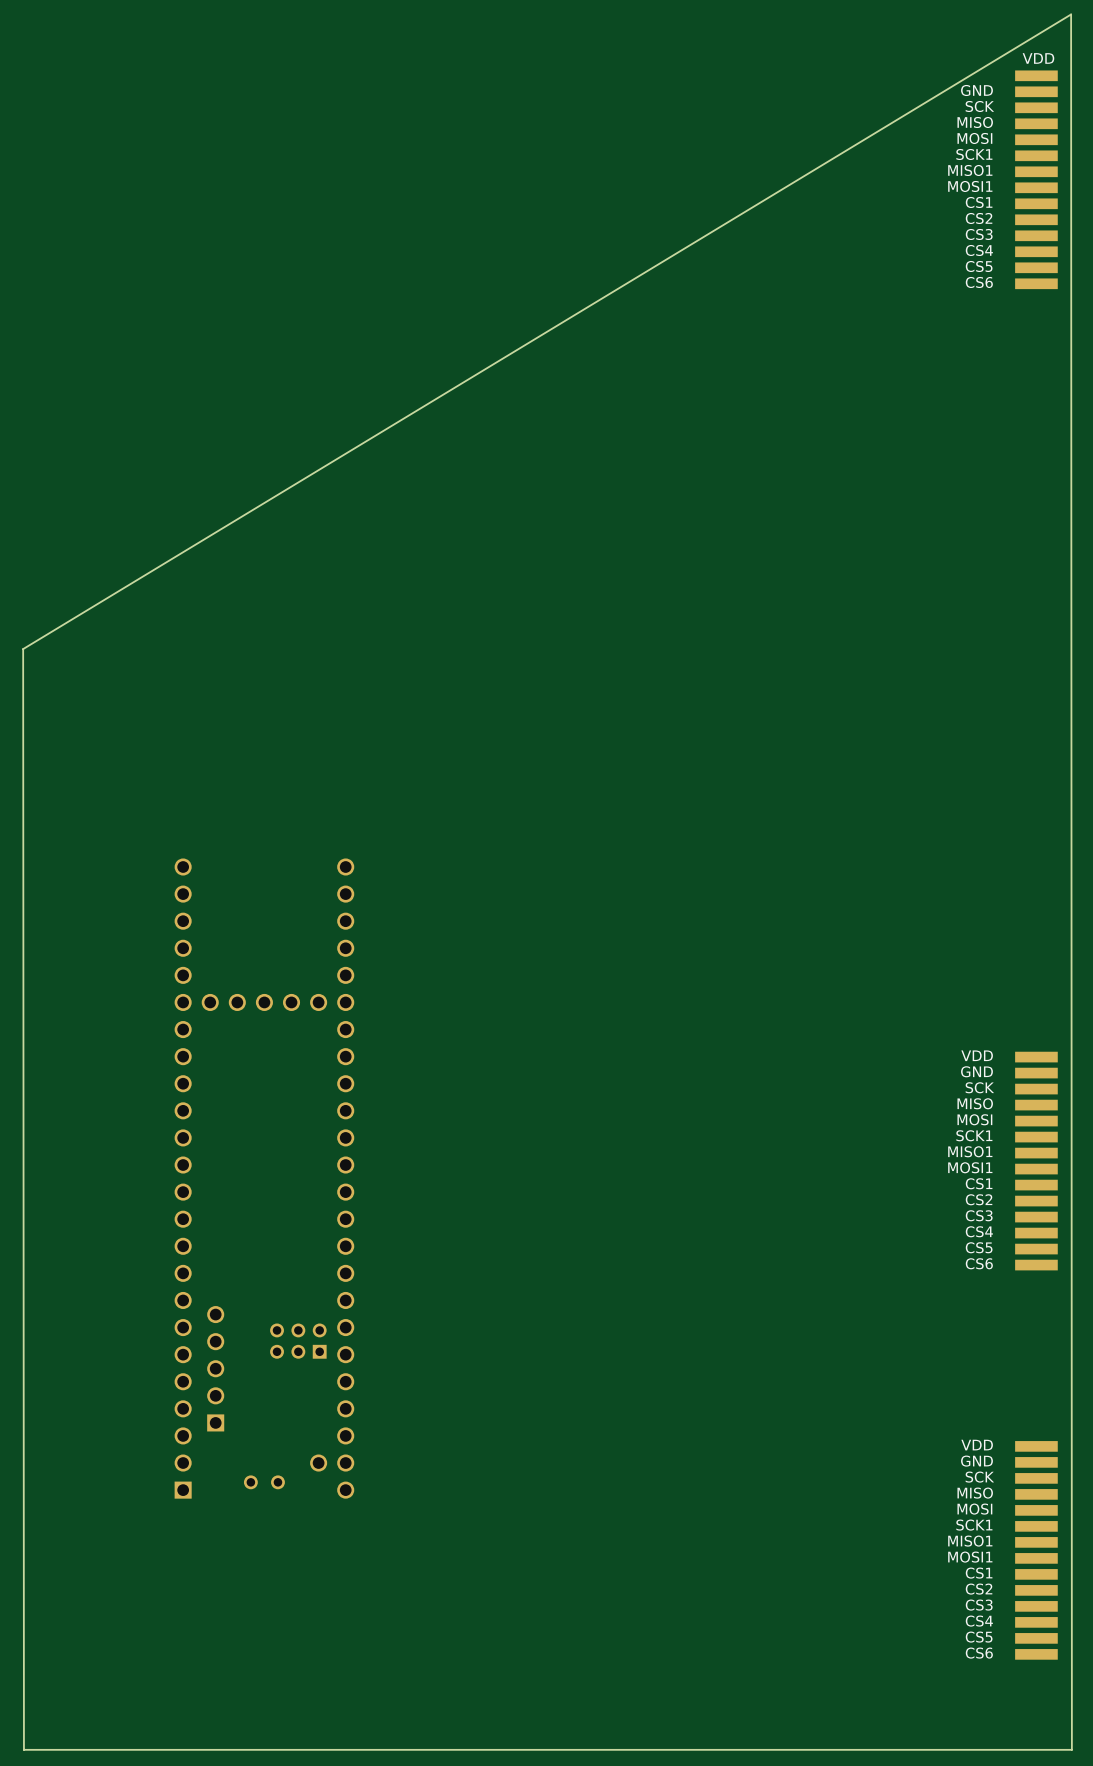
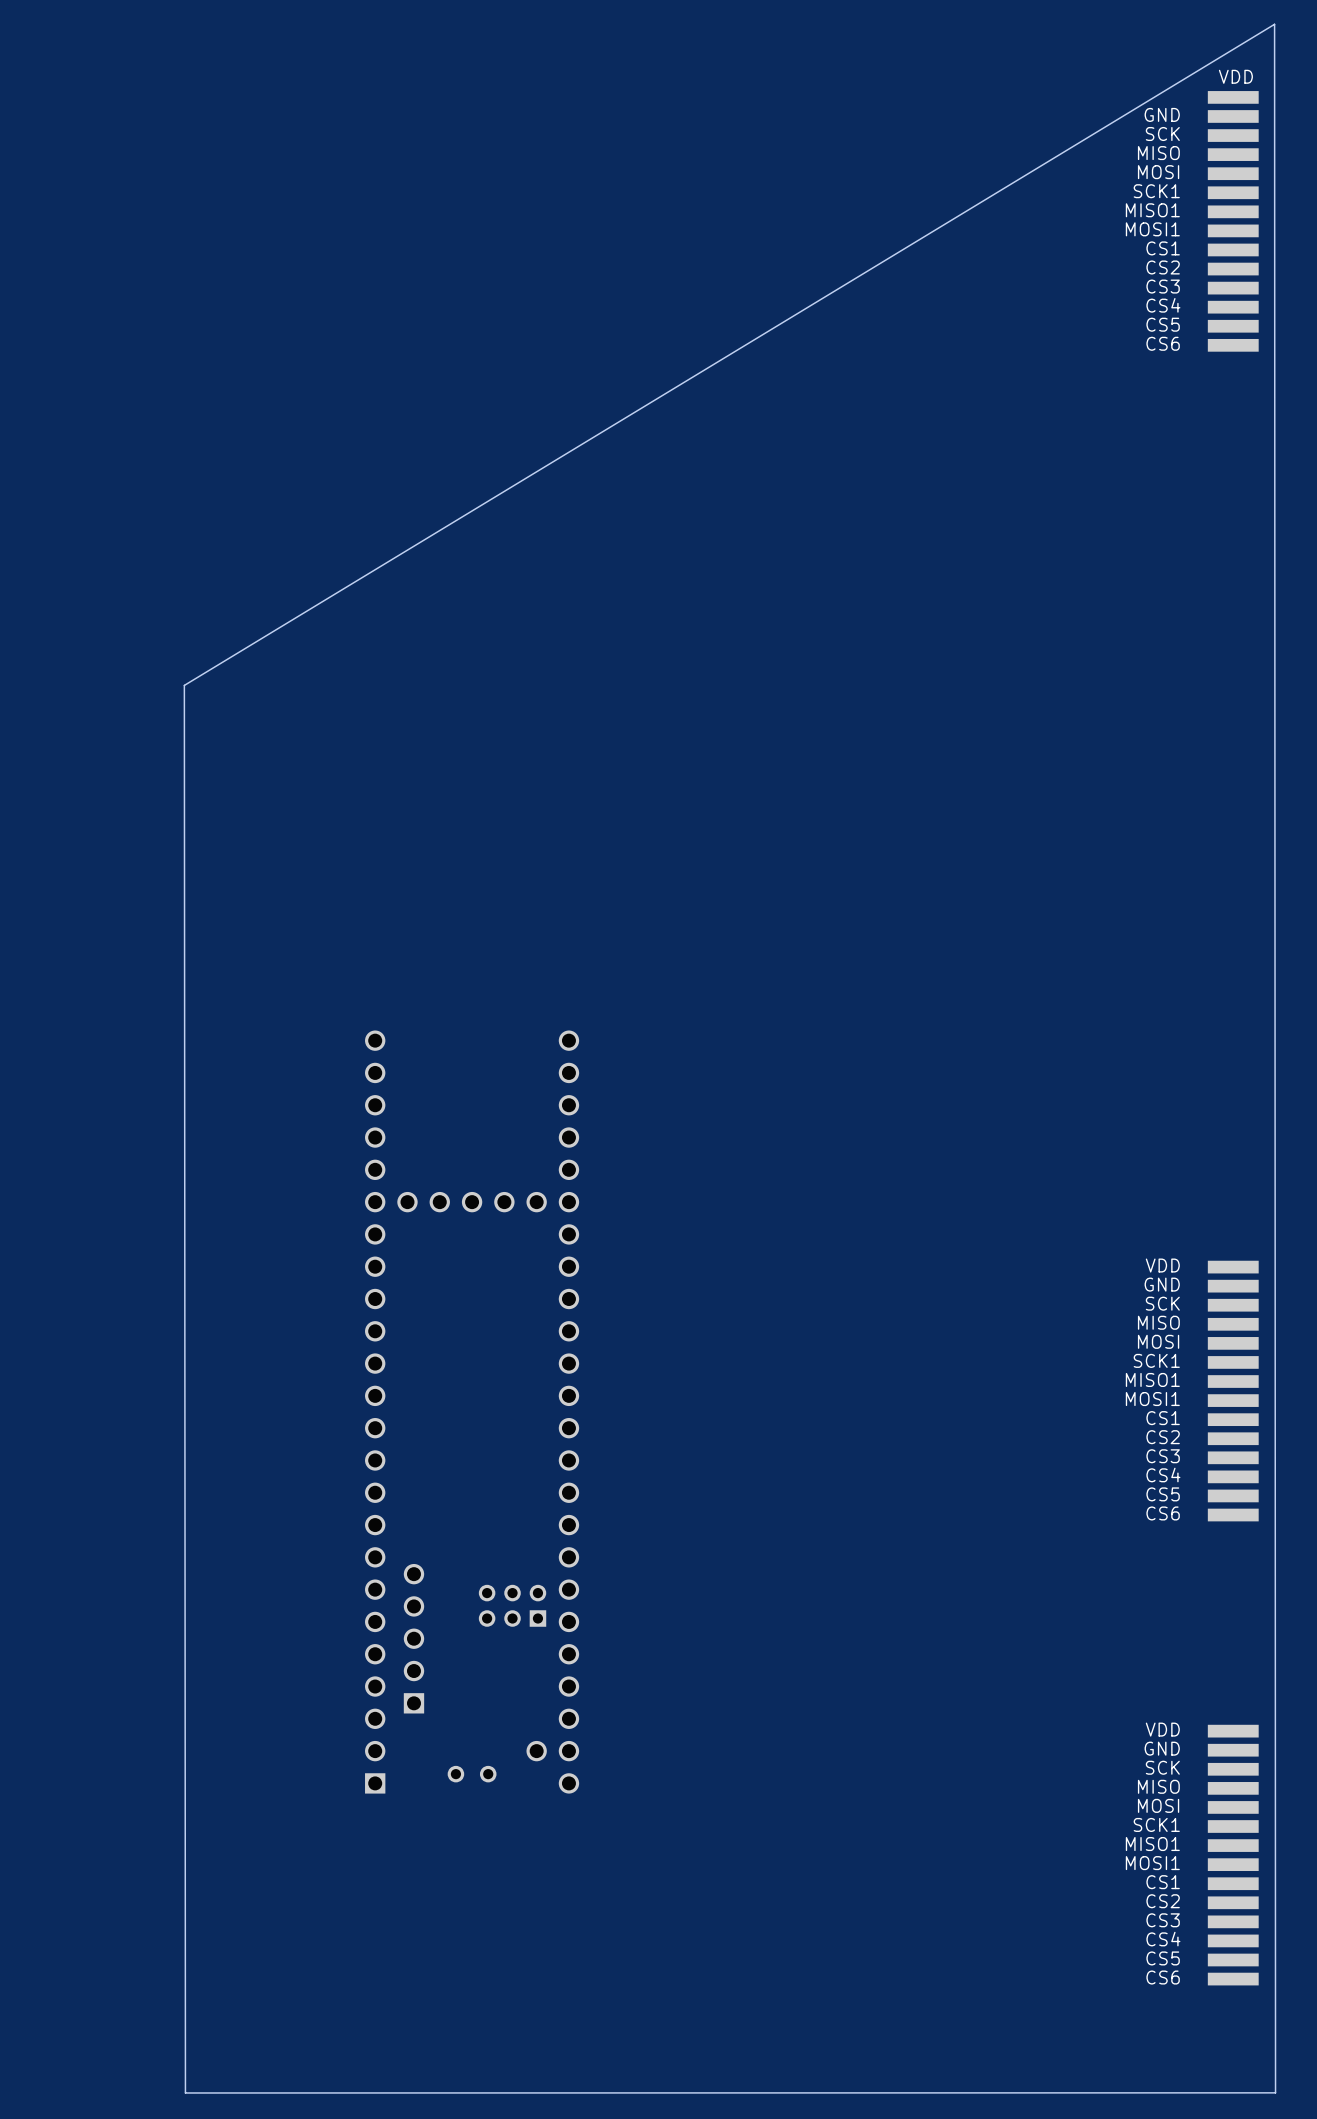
board edge: (1071, 14) (23, 649) (23, 1749) (1071, 1749) -> (1274, 24) (184, 685) (185, 2092) (1275, 2092)
part position: (264, 1178) -> (472, 1412)

